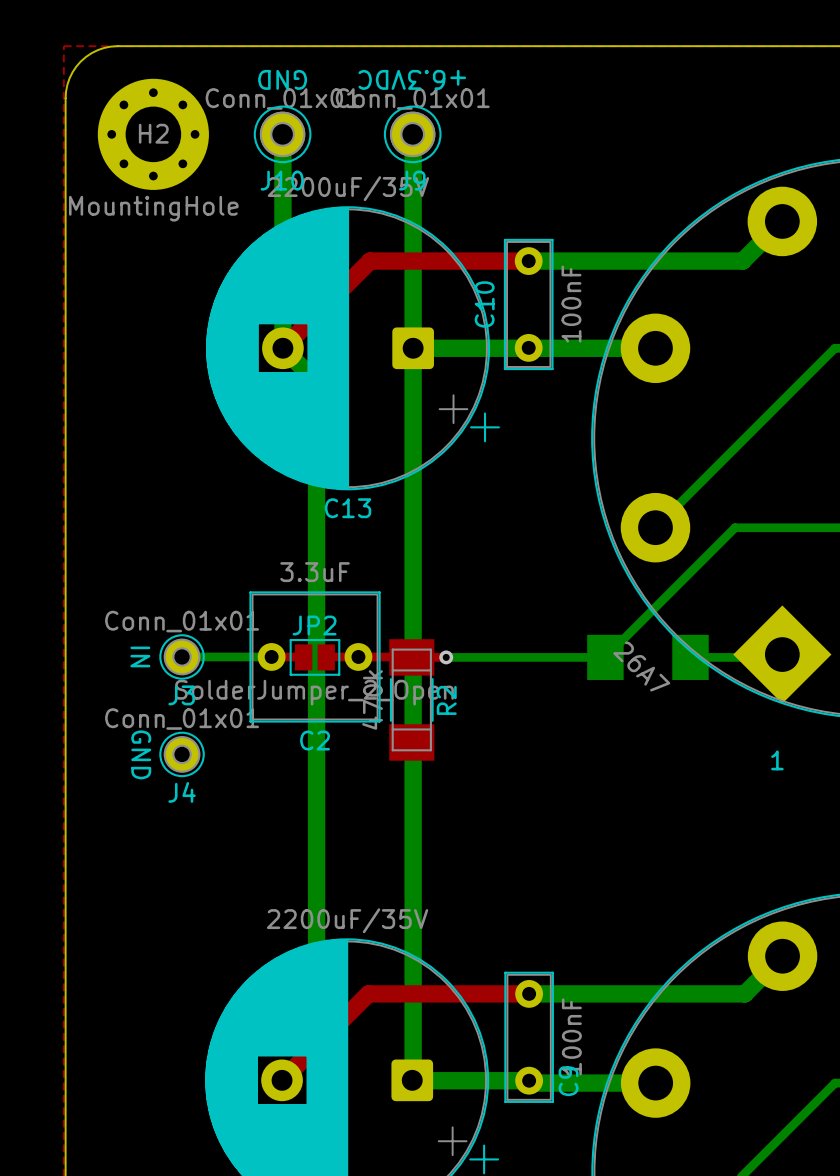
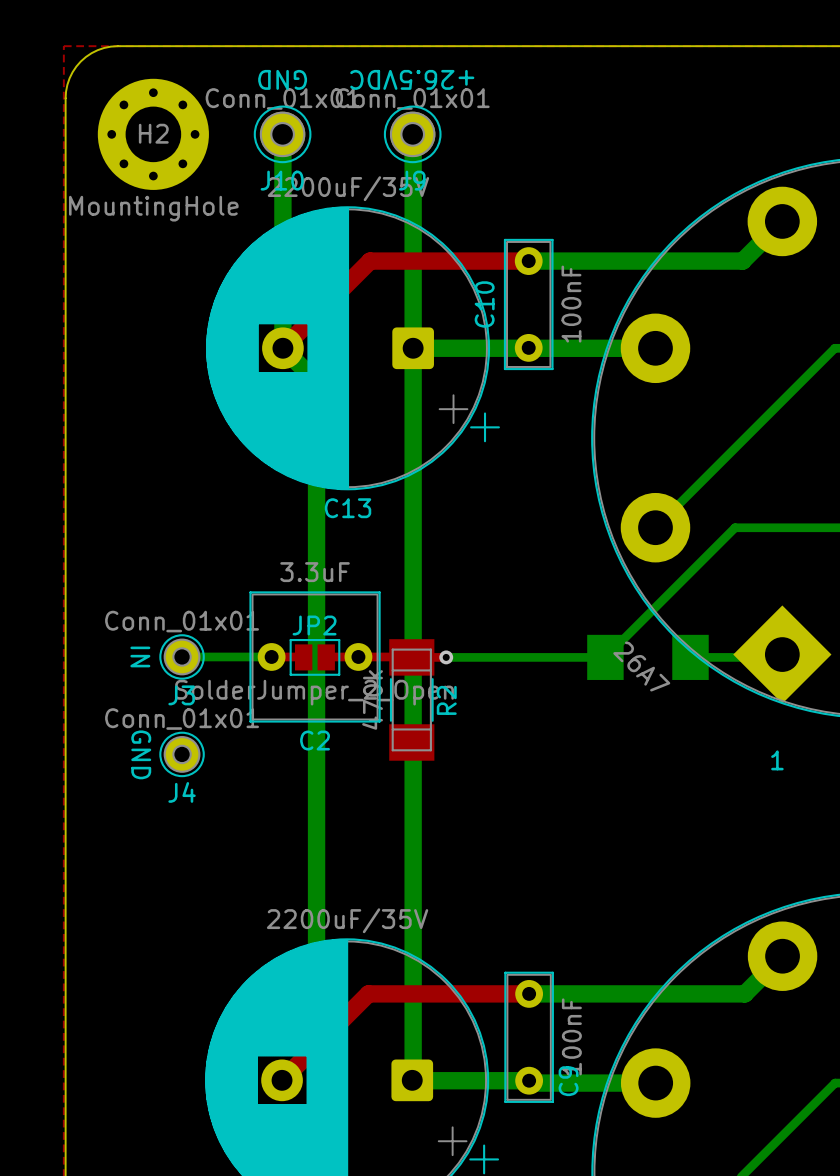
text: +6.3VDC (412, 79) -> +26.5VDC (412, 79)

